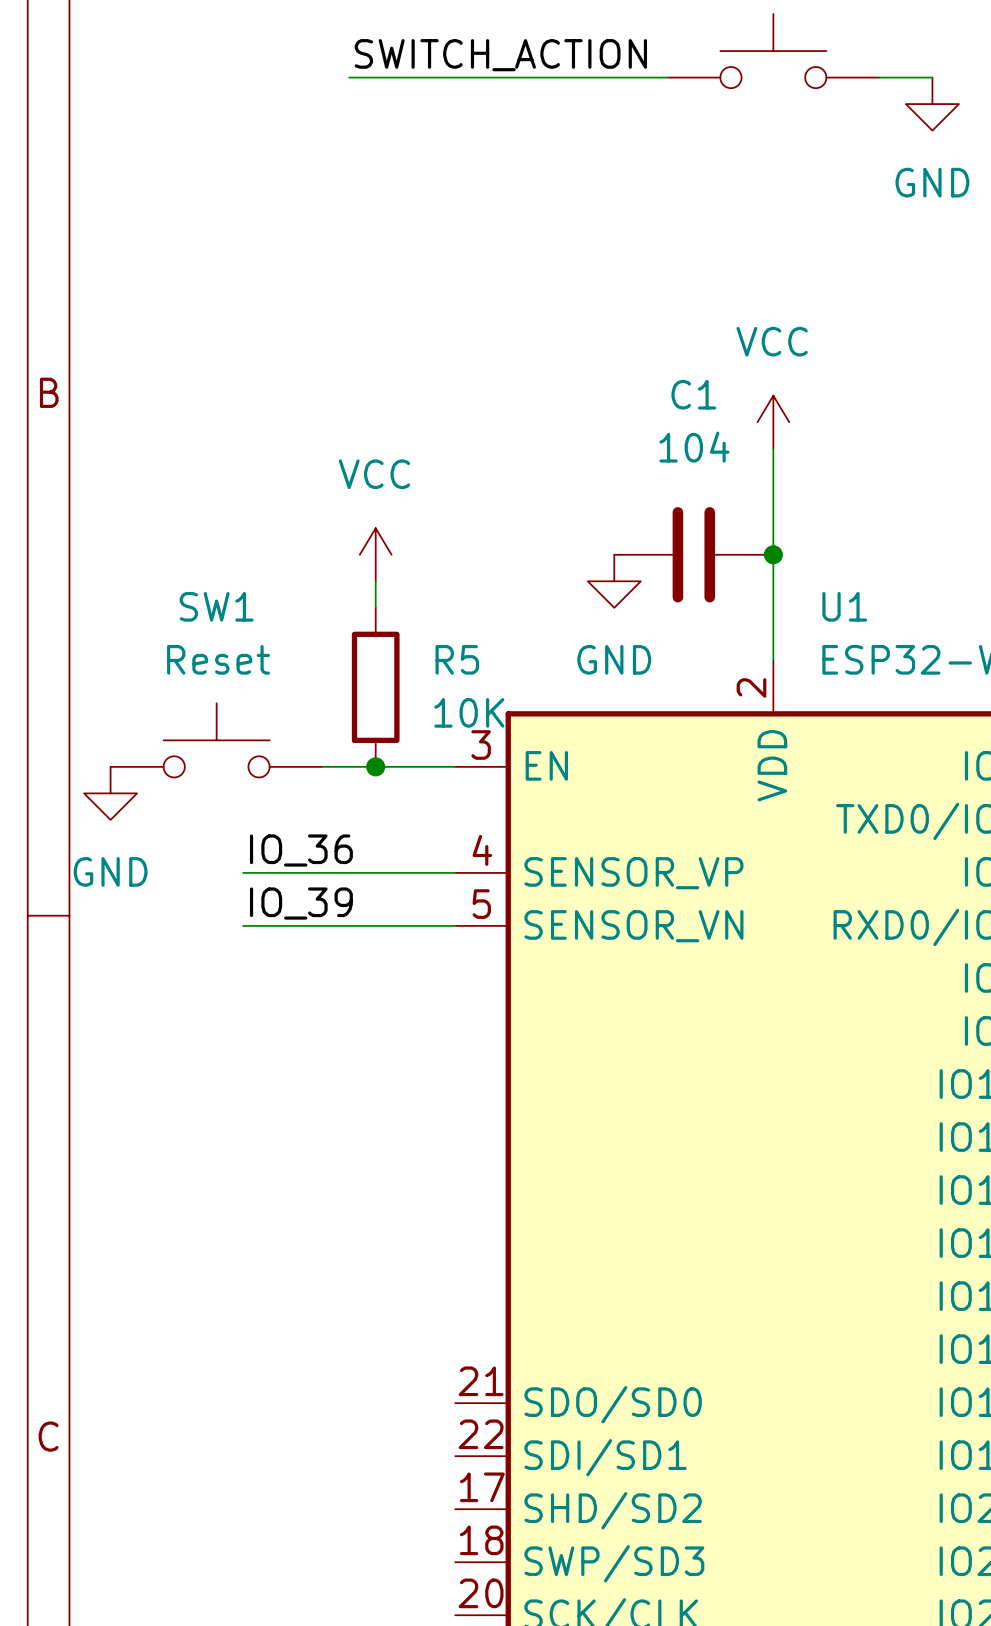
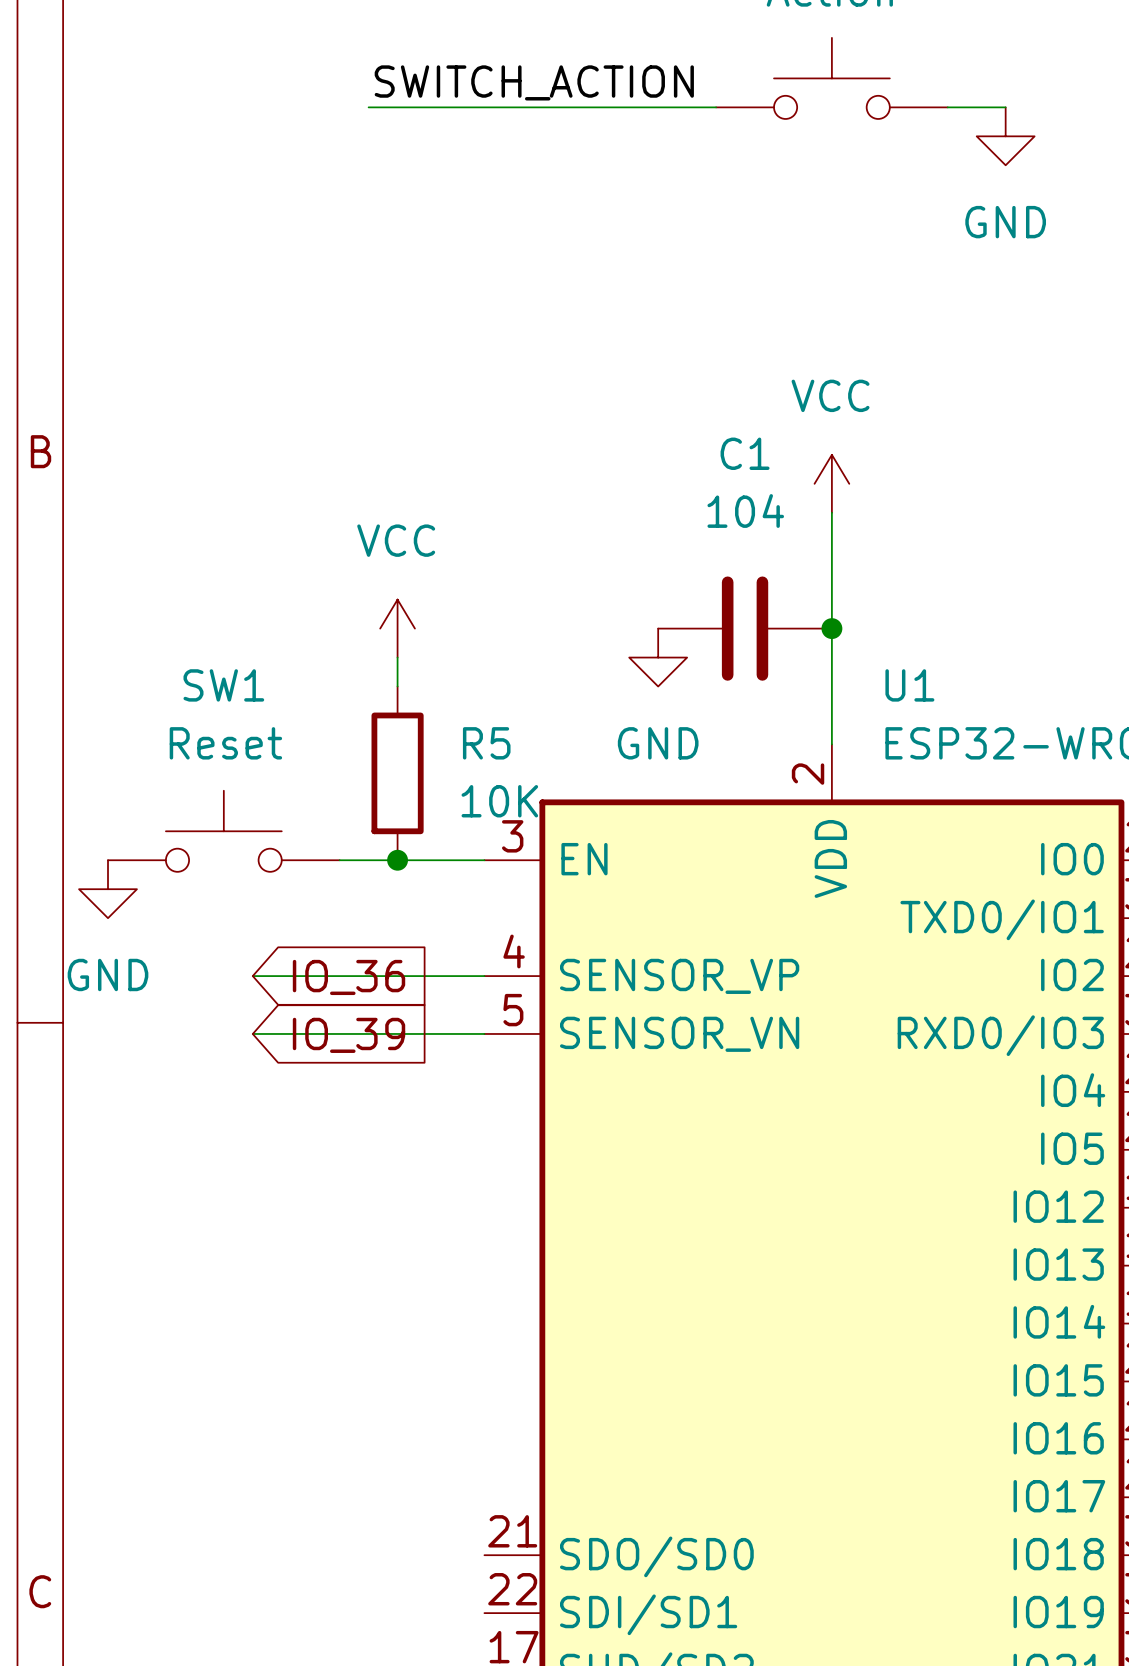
label: IO_36 (301, 850) -> none
global label: none -> IO_36 (349, 977)
label: IO_39 (301, 903) -> none
global label: none -> IO_39 (349, 1035)

